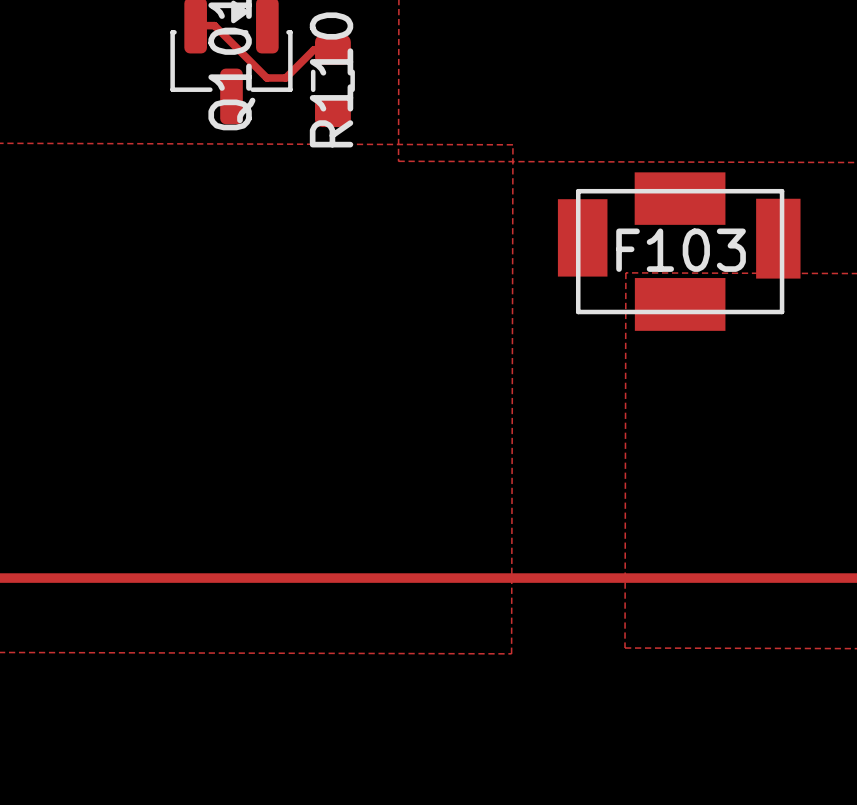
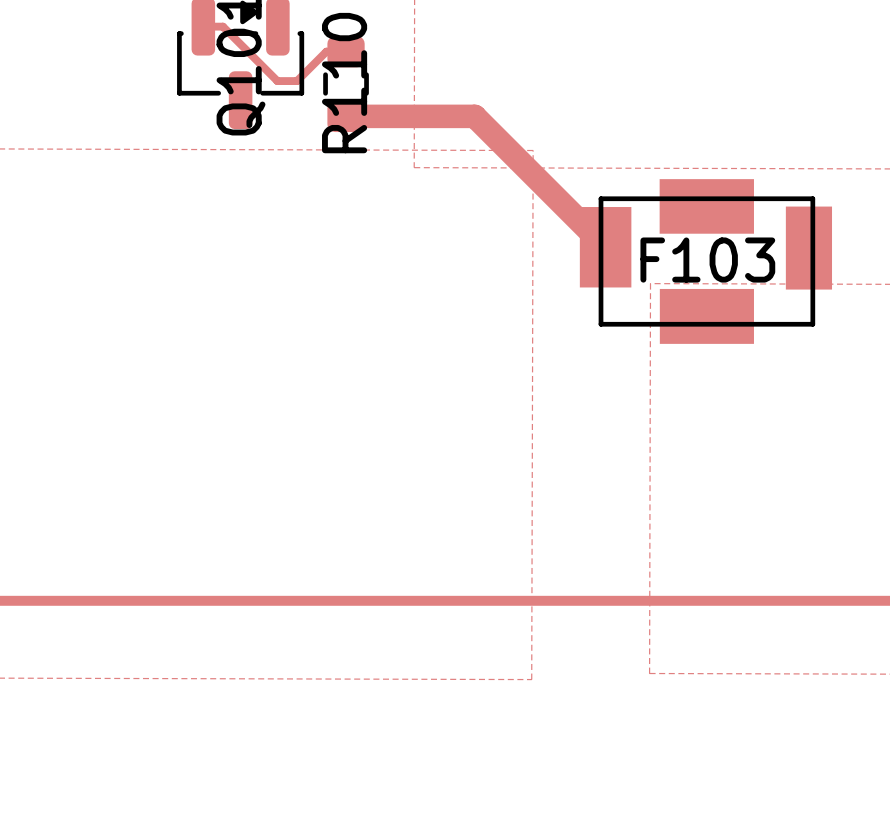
track: none -> (346, 116) (474, 116) (605, 247)

